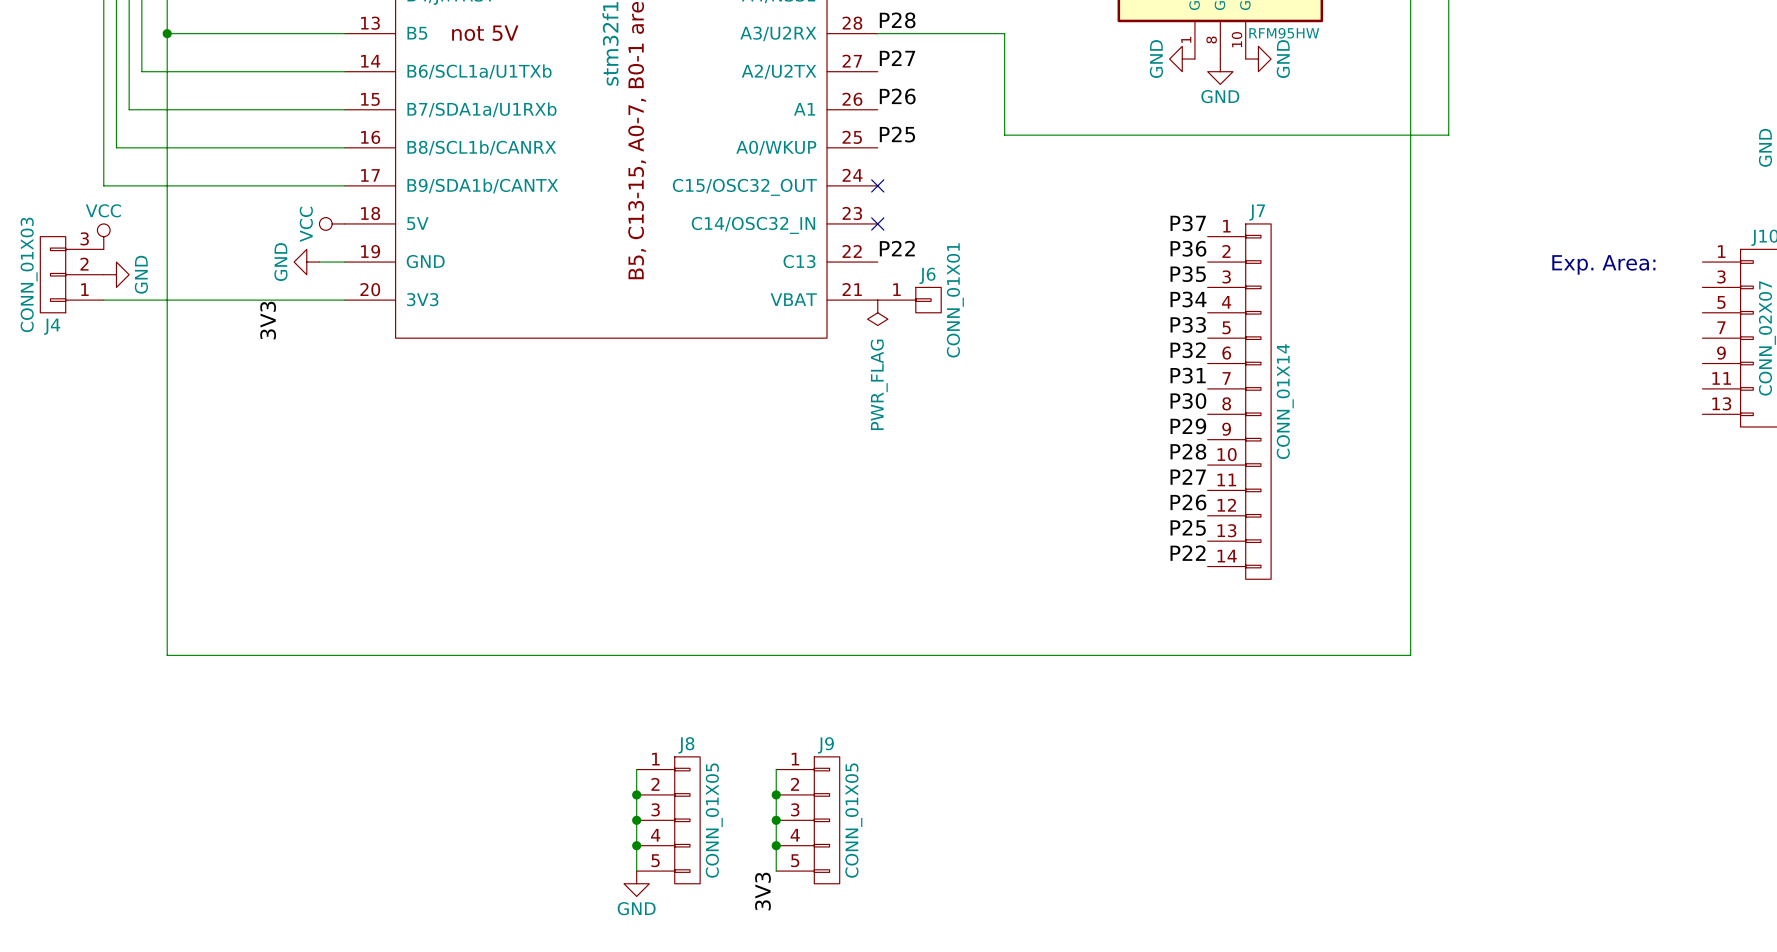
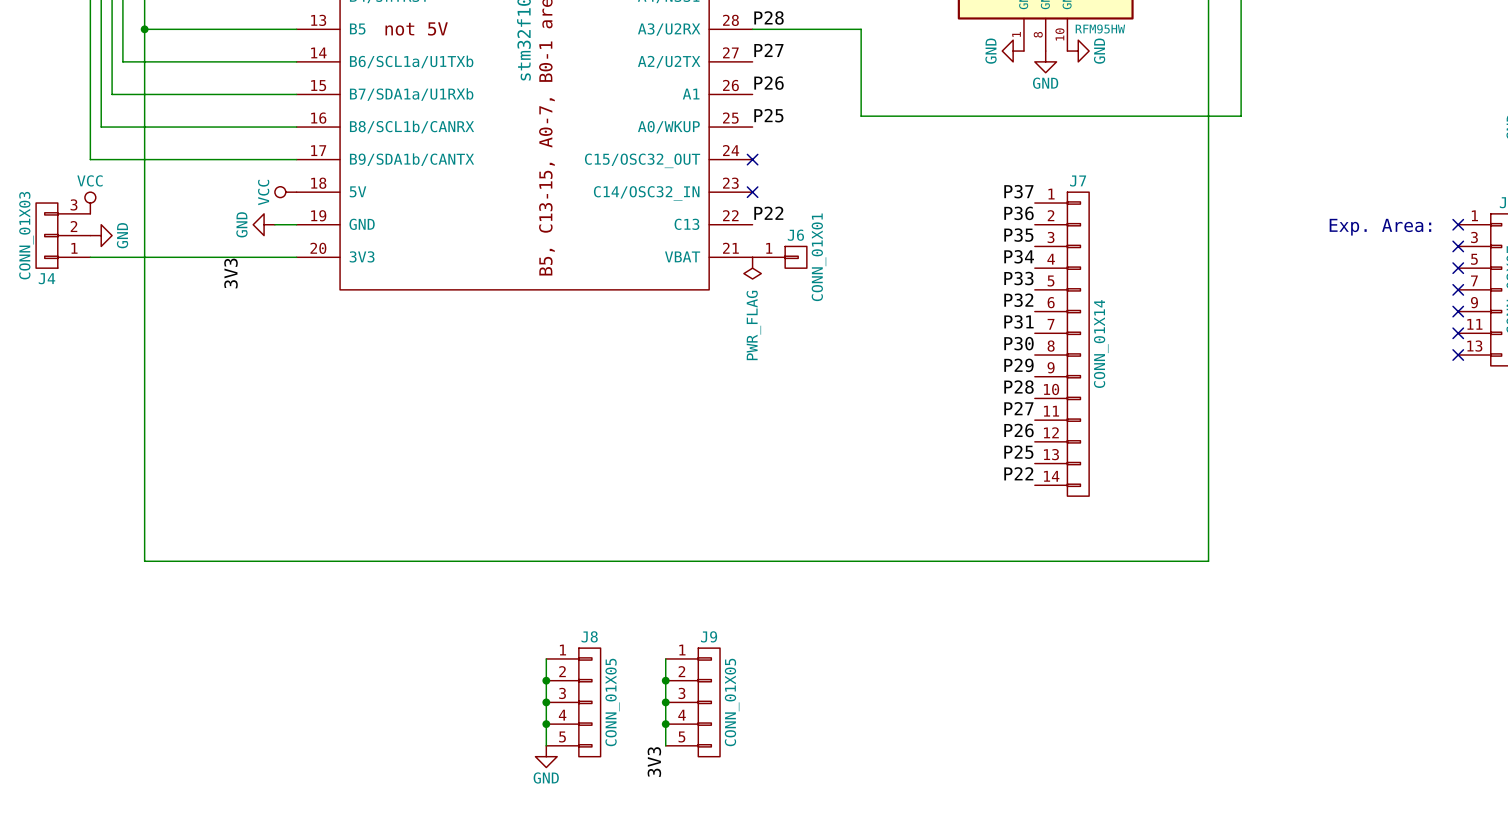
no-connect mark: none -> (1458, 224)
no-connect mark: none -> (1458, 246)
no-connect mark: none -> (1458, 268)
no-connect mark: none -> (1458, 289)
no-connect mark: none -> (1458, 311)
no-connect mark: none -> (1458, 333)
no-connect mark: none -> (1458, 355)

